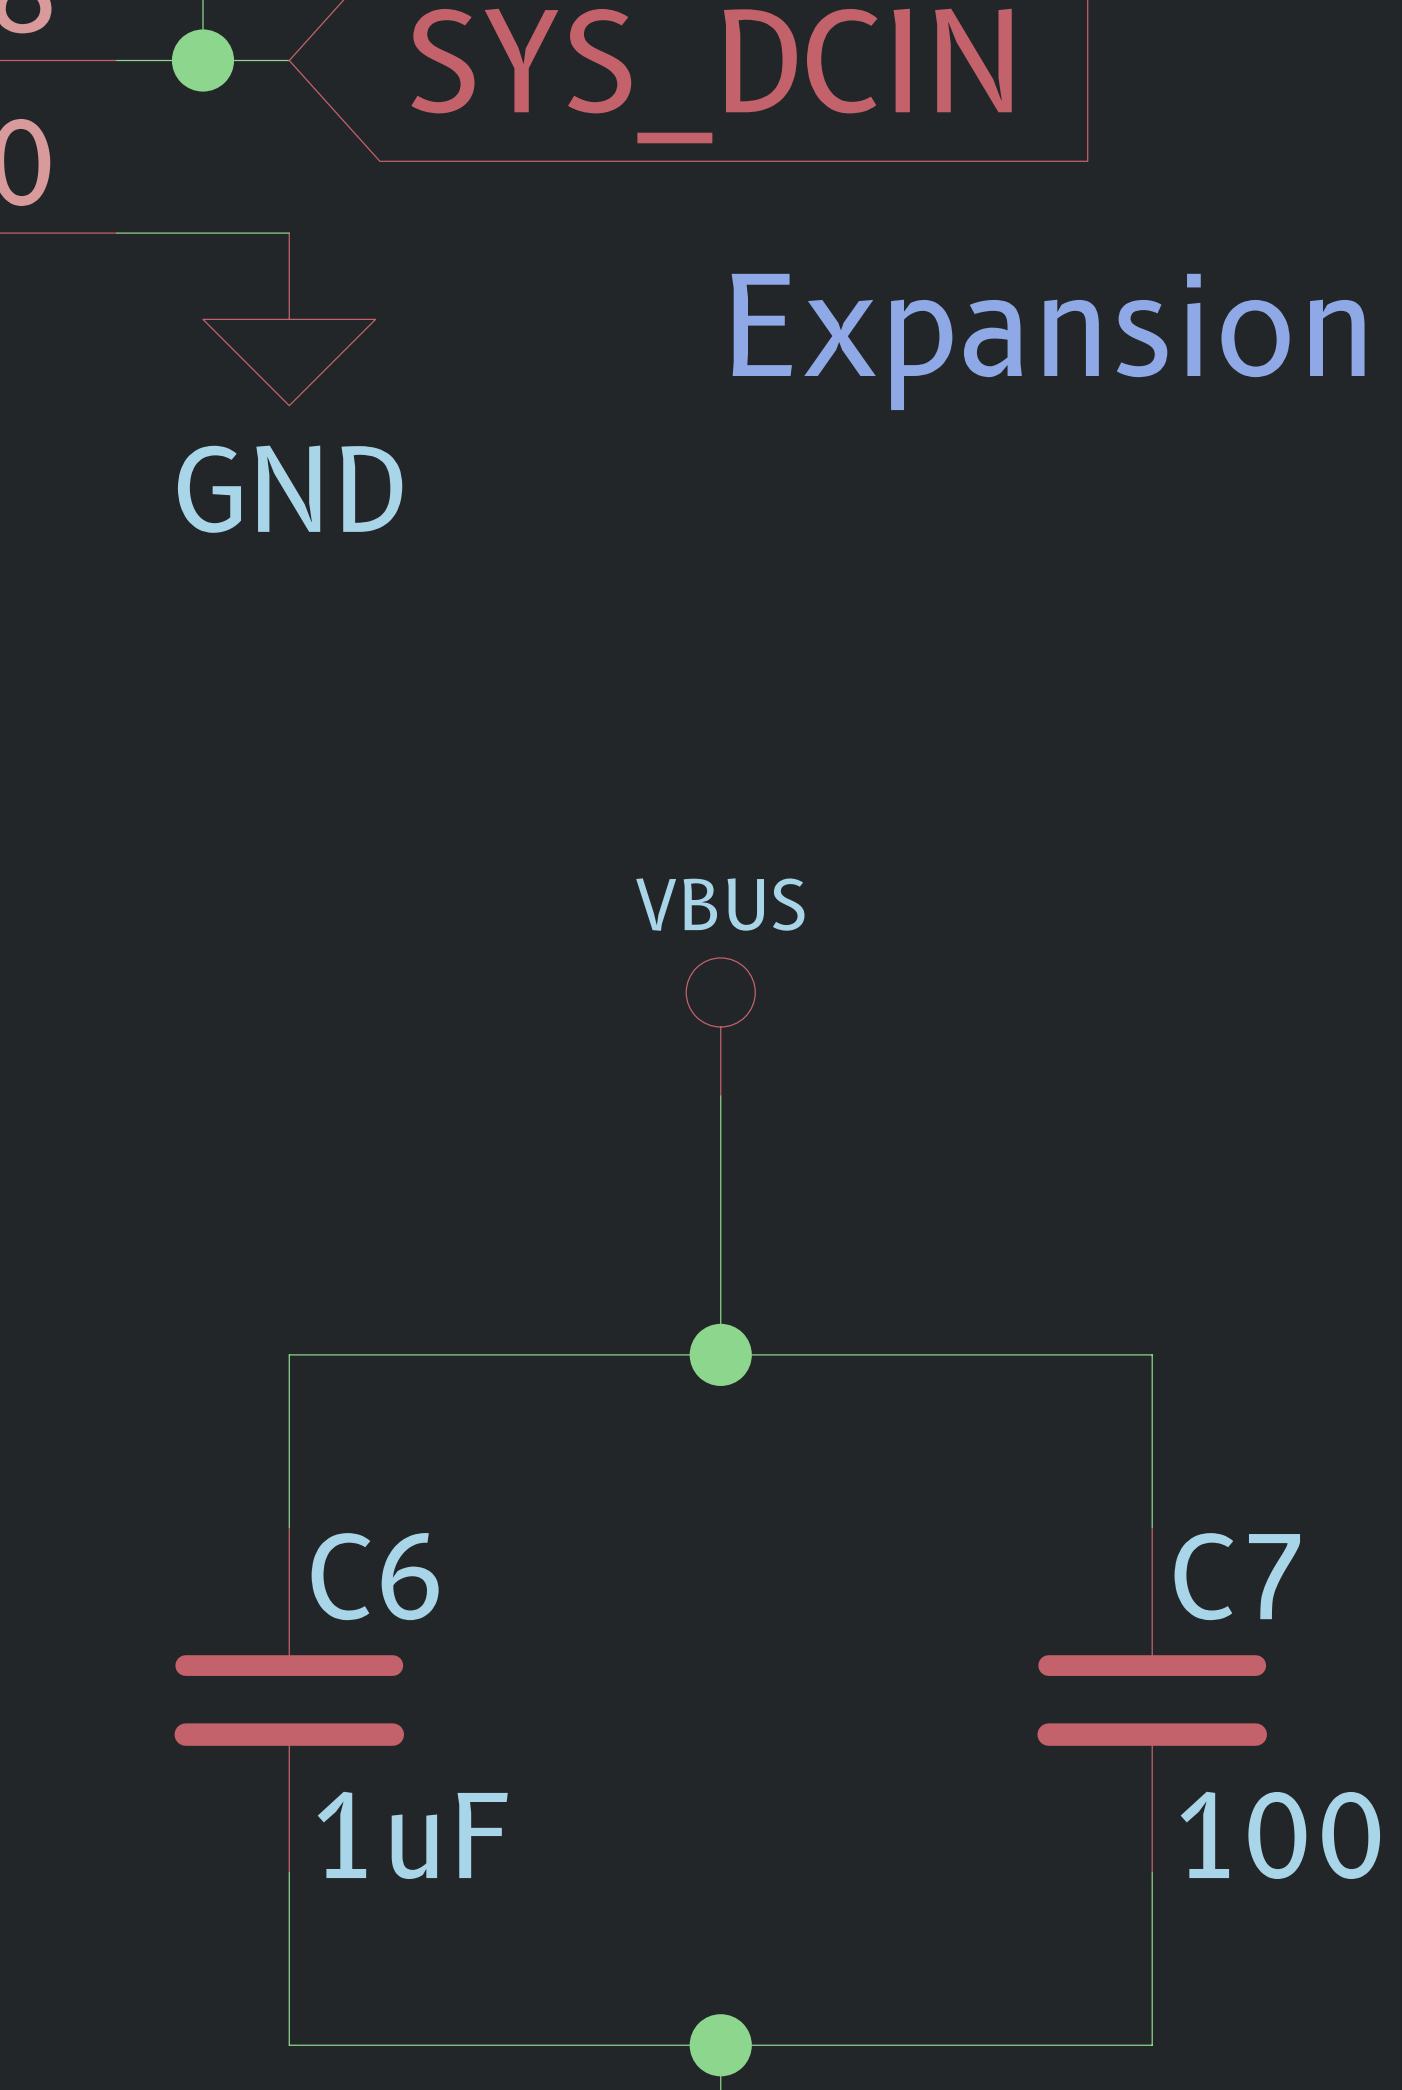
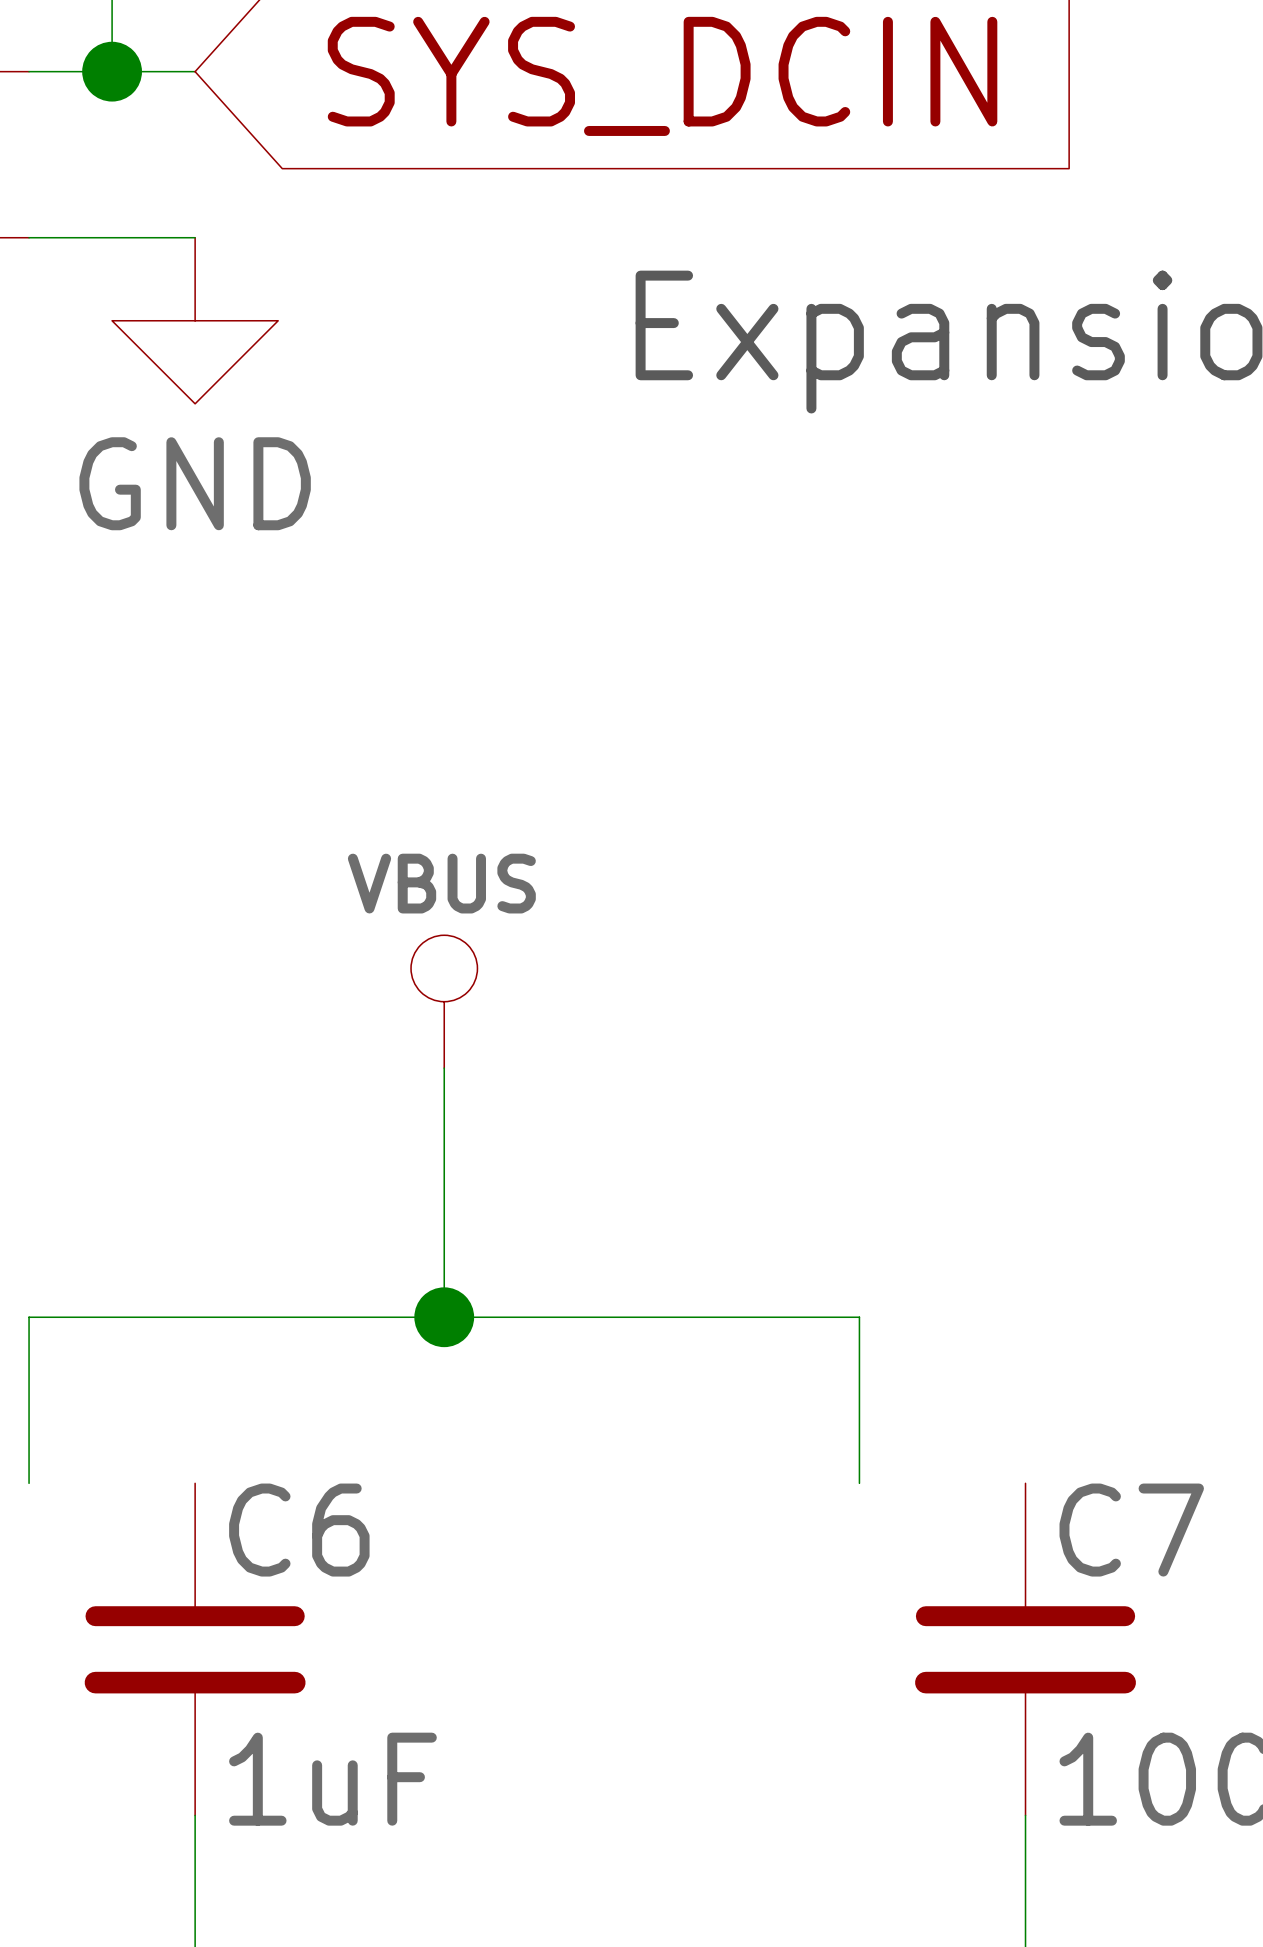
power symbol position: VBUS (720, 1026) -> VBUS (444, 1001)
wire: (720, 1096) (720, 1354) -> (444, 1068) (444, 1317)
wire: (289, 1354) (289, 1527) -> (195, 1317) (29, 1317) (29, 1483)
junction position: (720, 1354) -> (444, 1317)
wire: (979, 1354) (1152, 1354) (1152, 1527) -> (859, 1317) (859, 1483)

